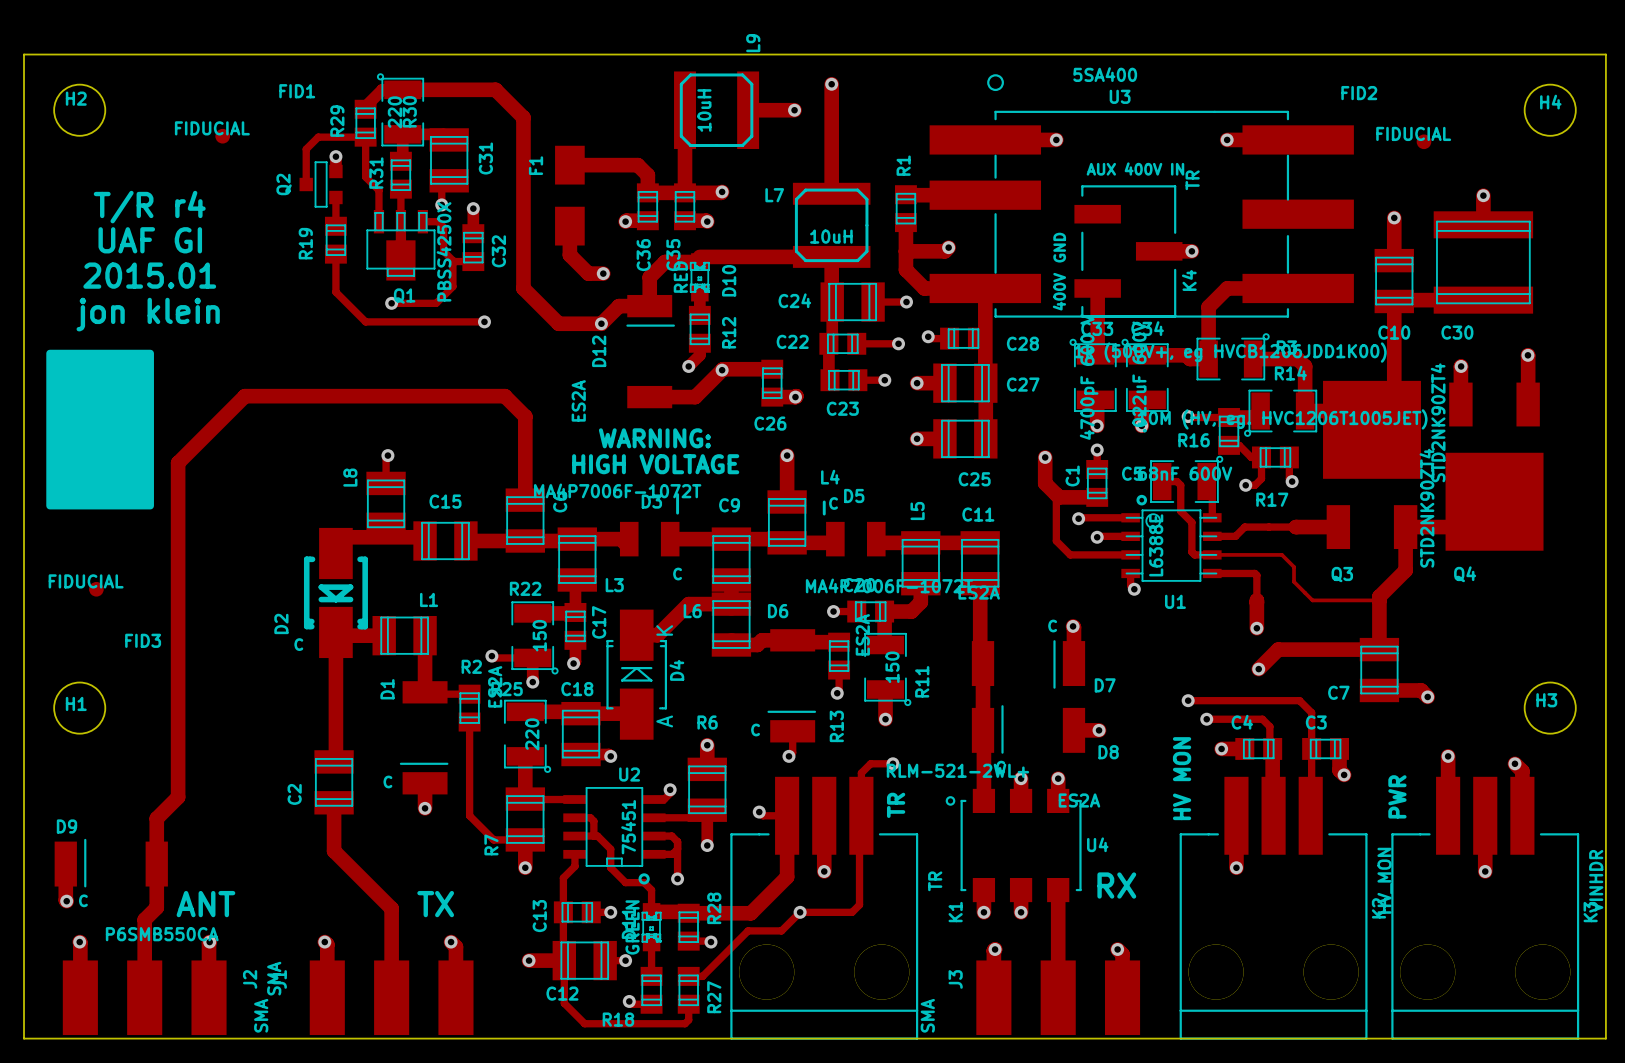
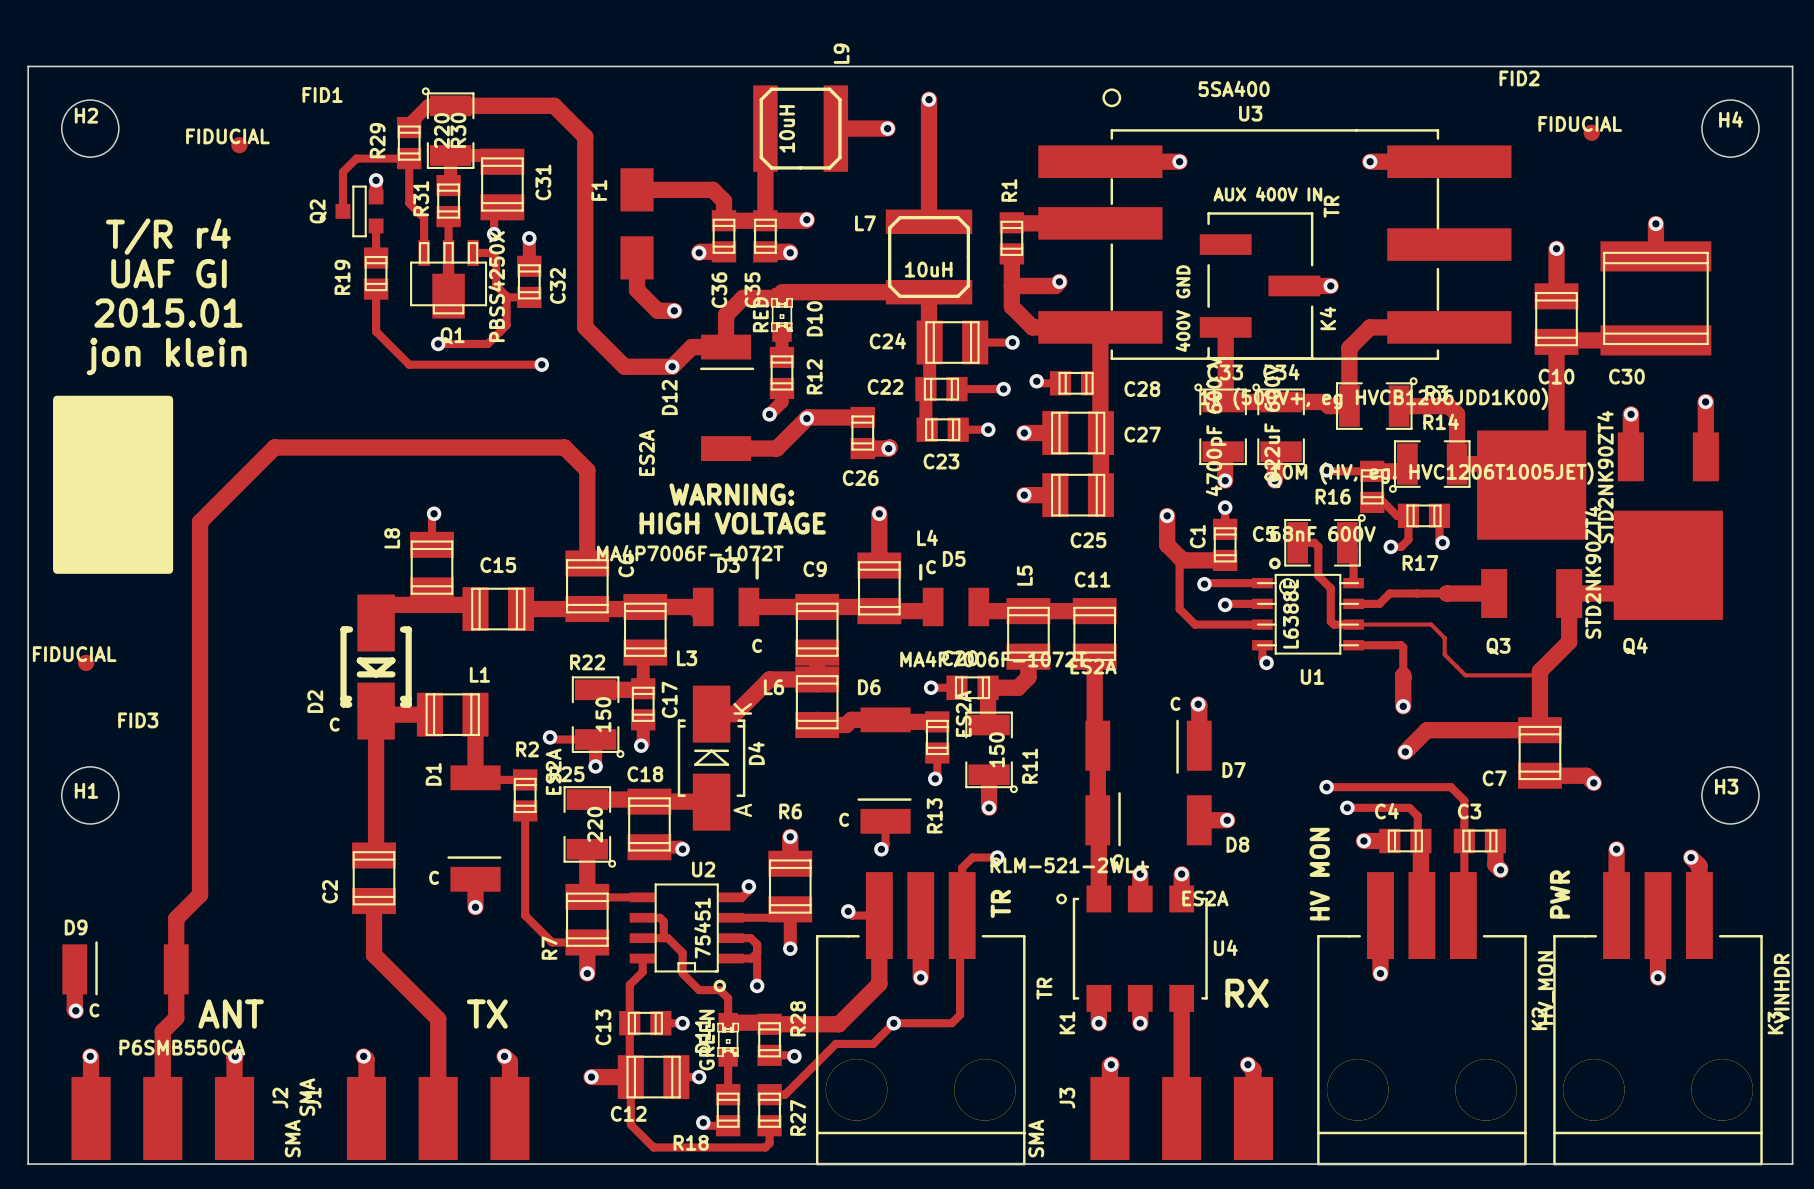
FID1 position: (222, 136) -> (239, 145)
FID2 position: (1423, 141) -> (1591, 132)
FID3 position: (96, 589) -> (86, 662)

